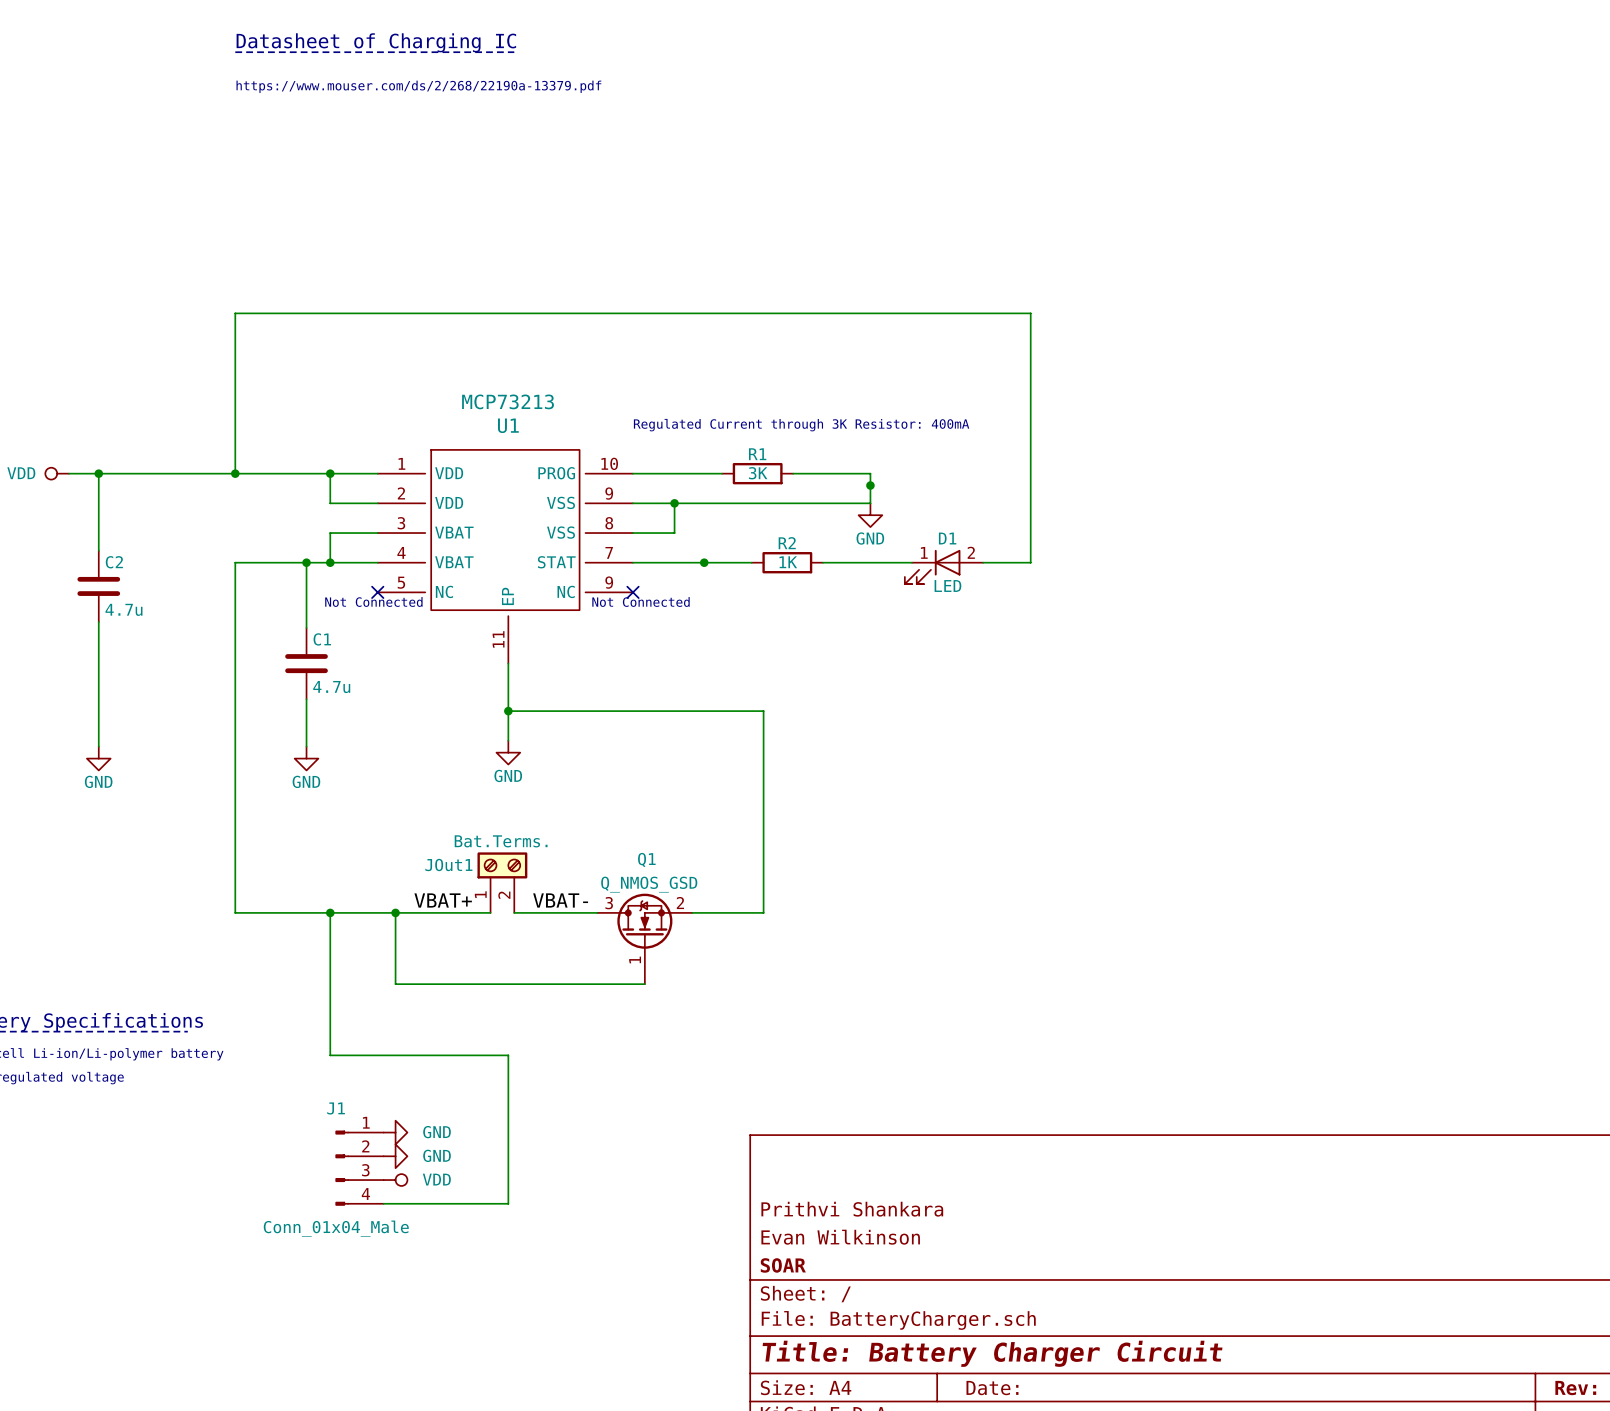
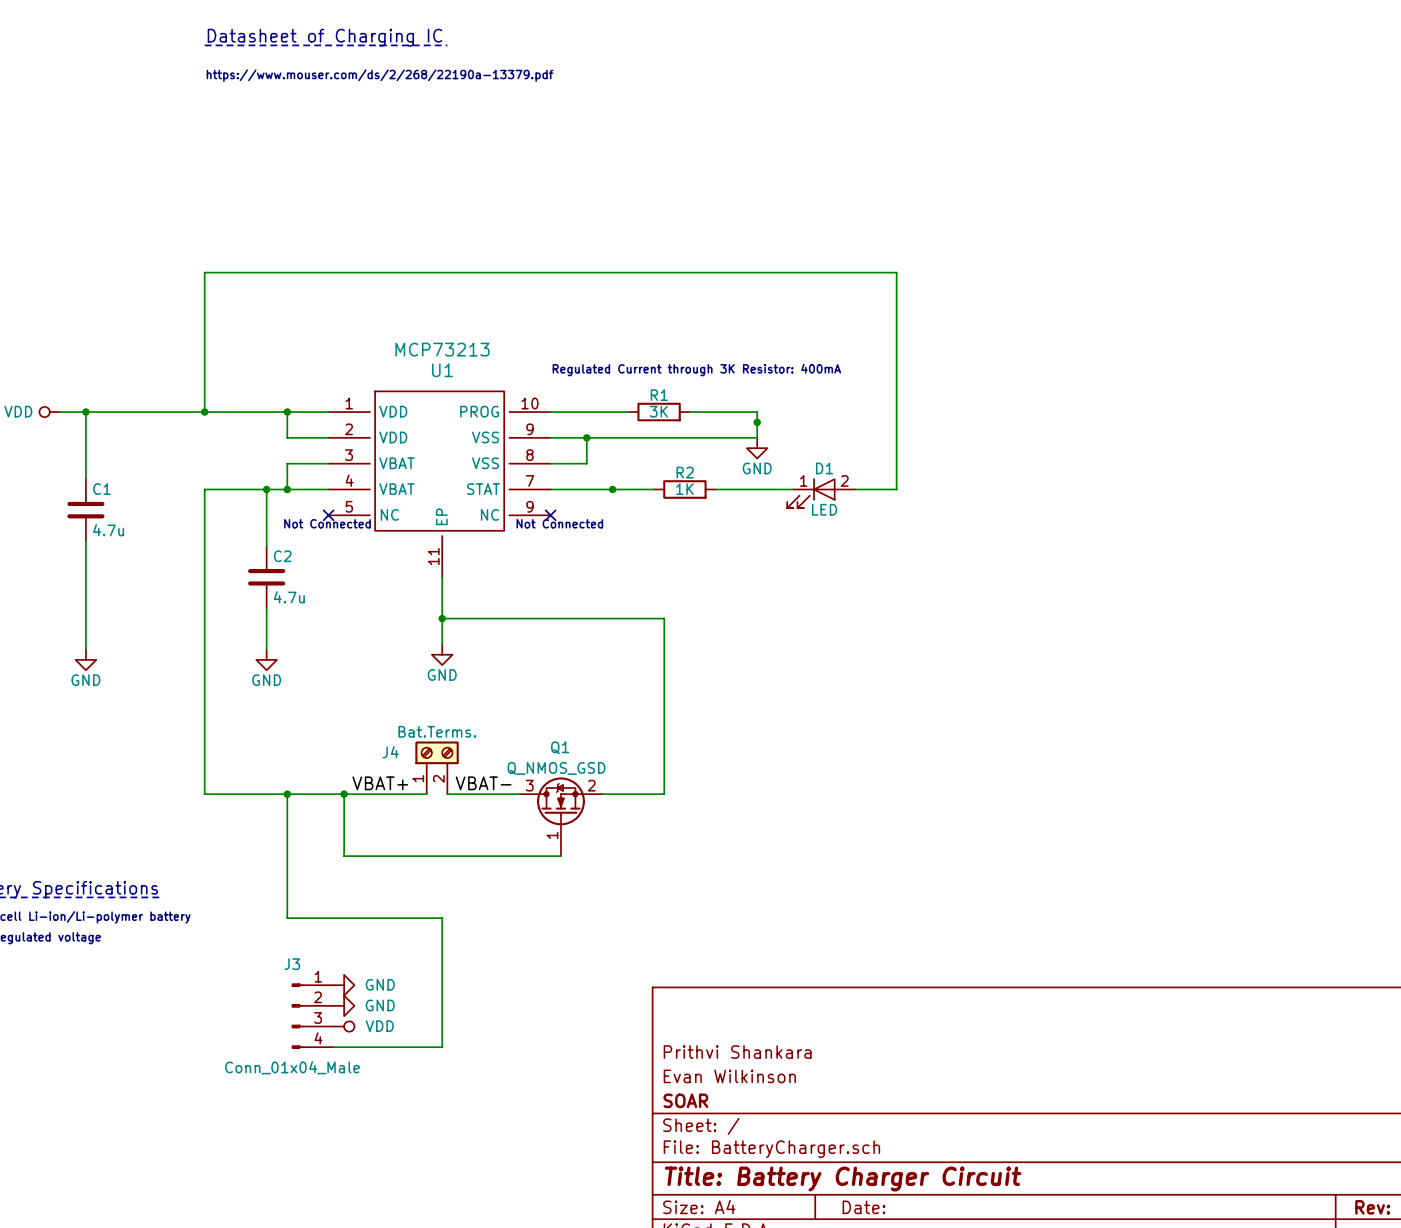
C2 name: C2 (114, 562) -> C1 (101, 489)
C1 name: C1 (322, 639) -> C2 (282, 556)
JOut1 name: JOut1 (448, 864) -> J4 (390, 752)
J1 name: J1 (336, 1108) -> J3 (292, 964)

